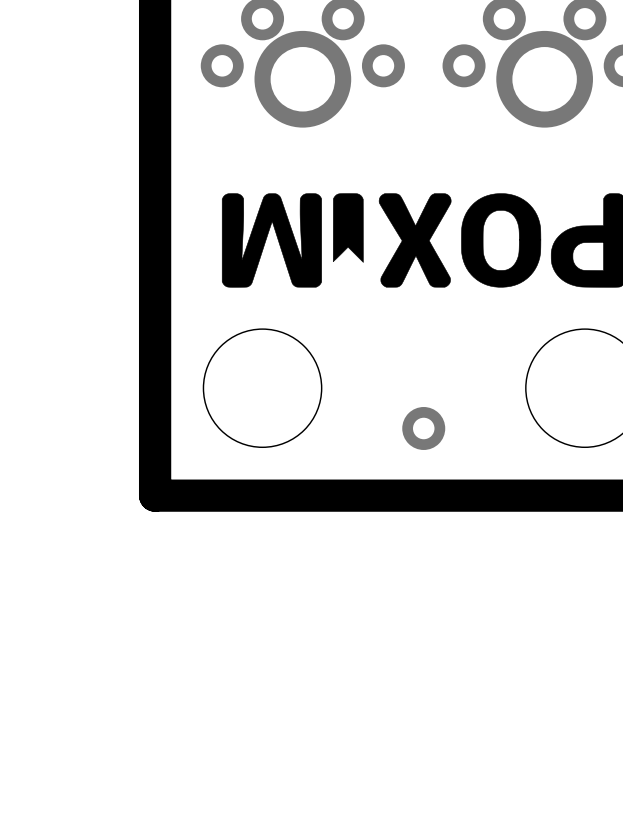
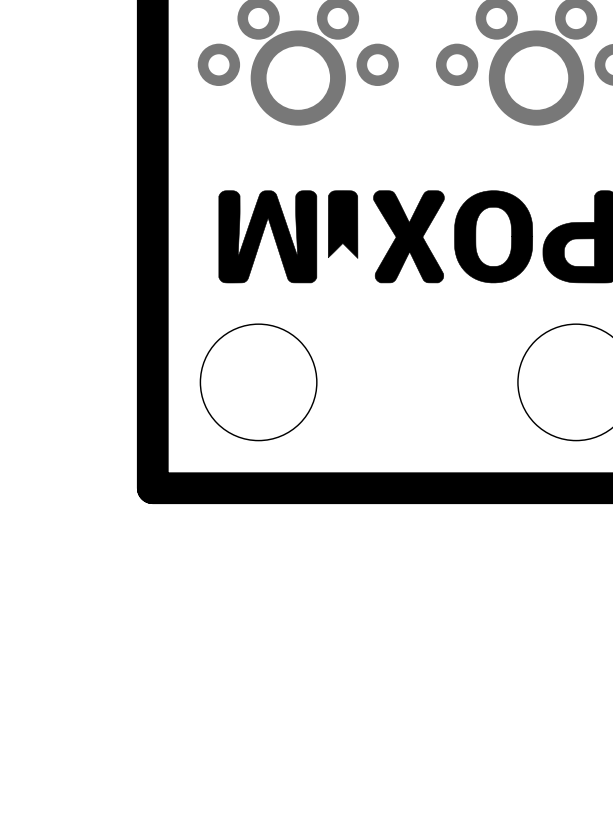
via: (423, 428) -> none

